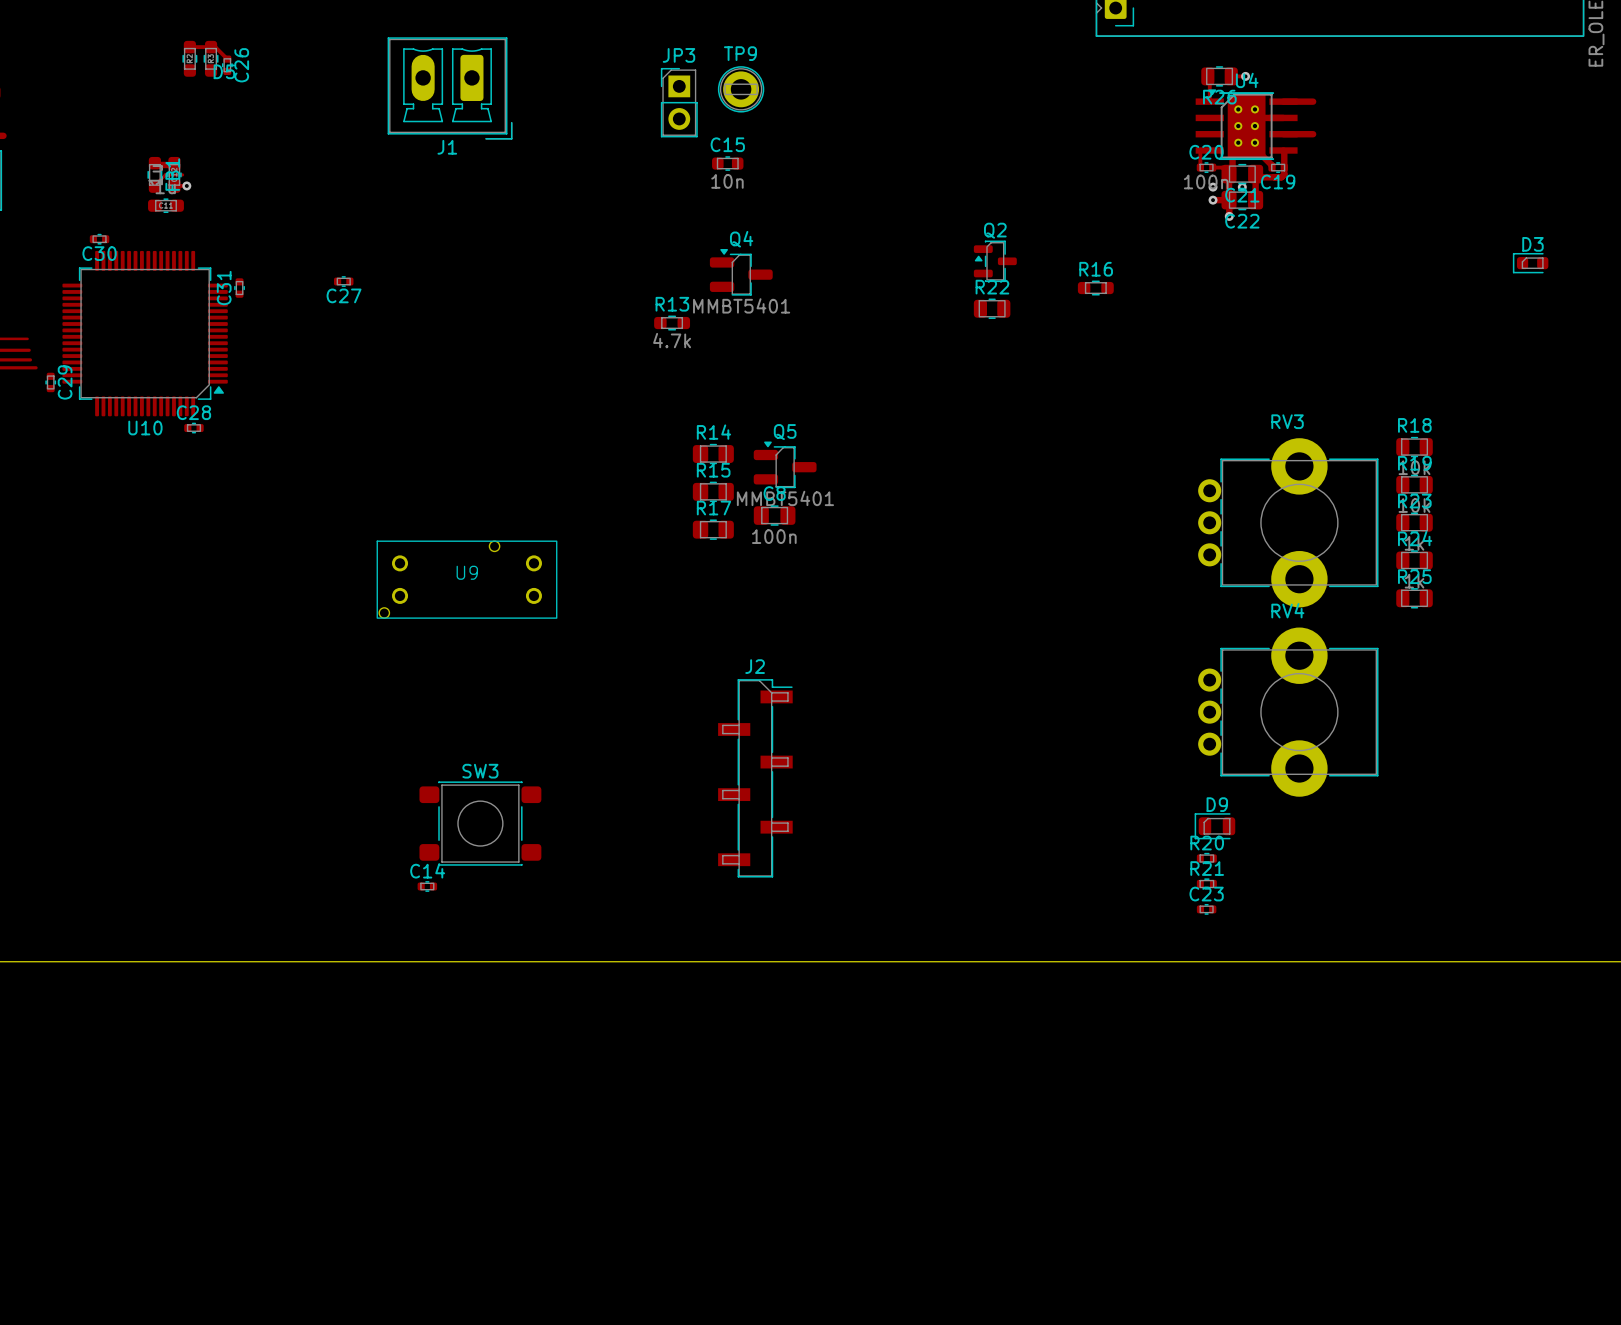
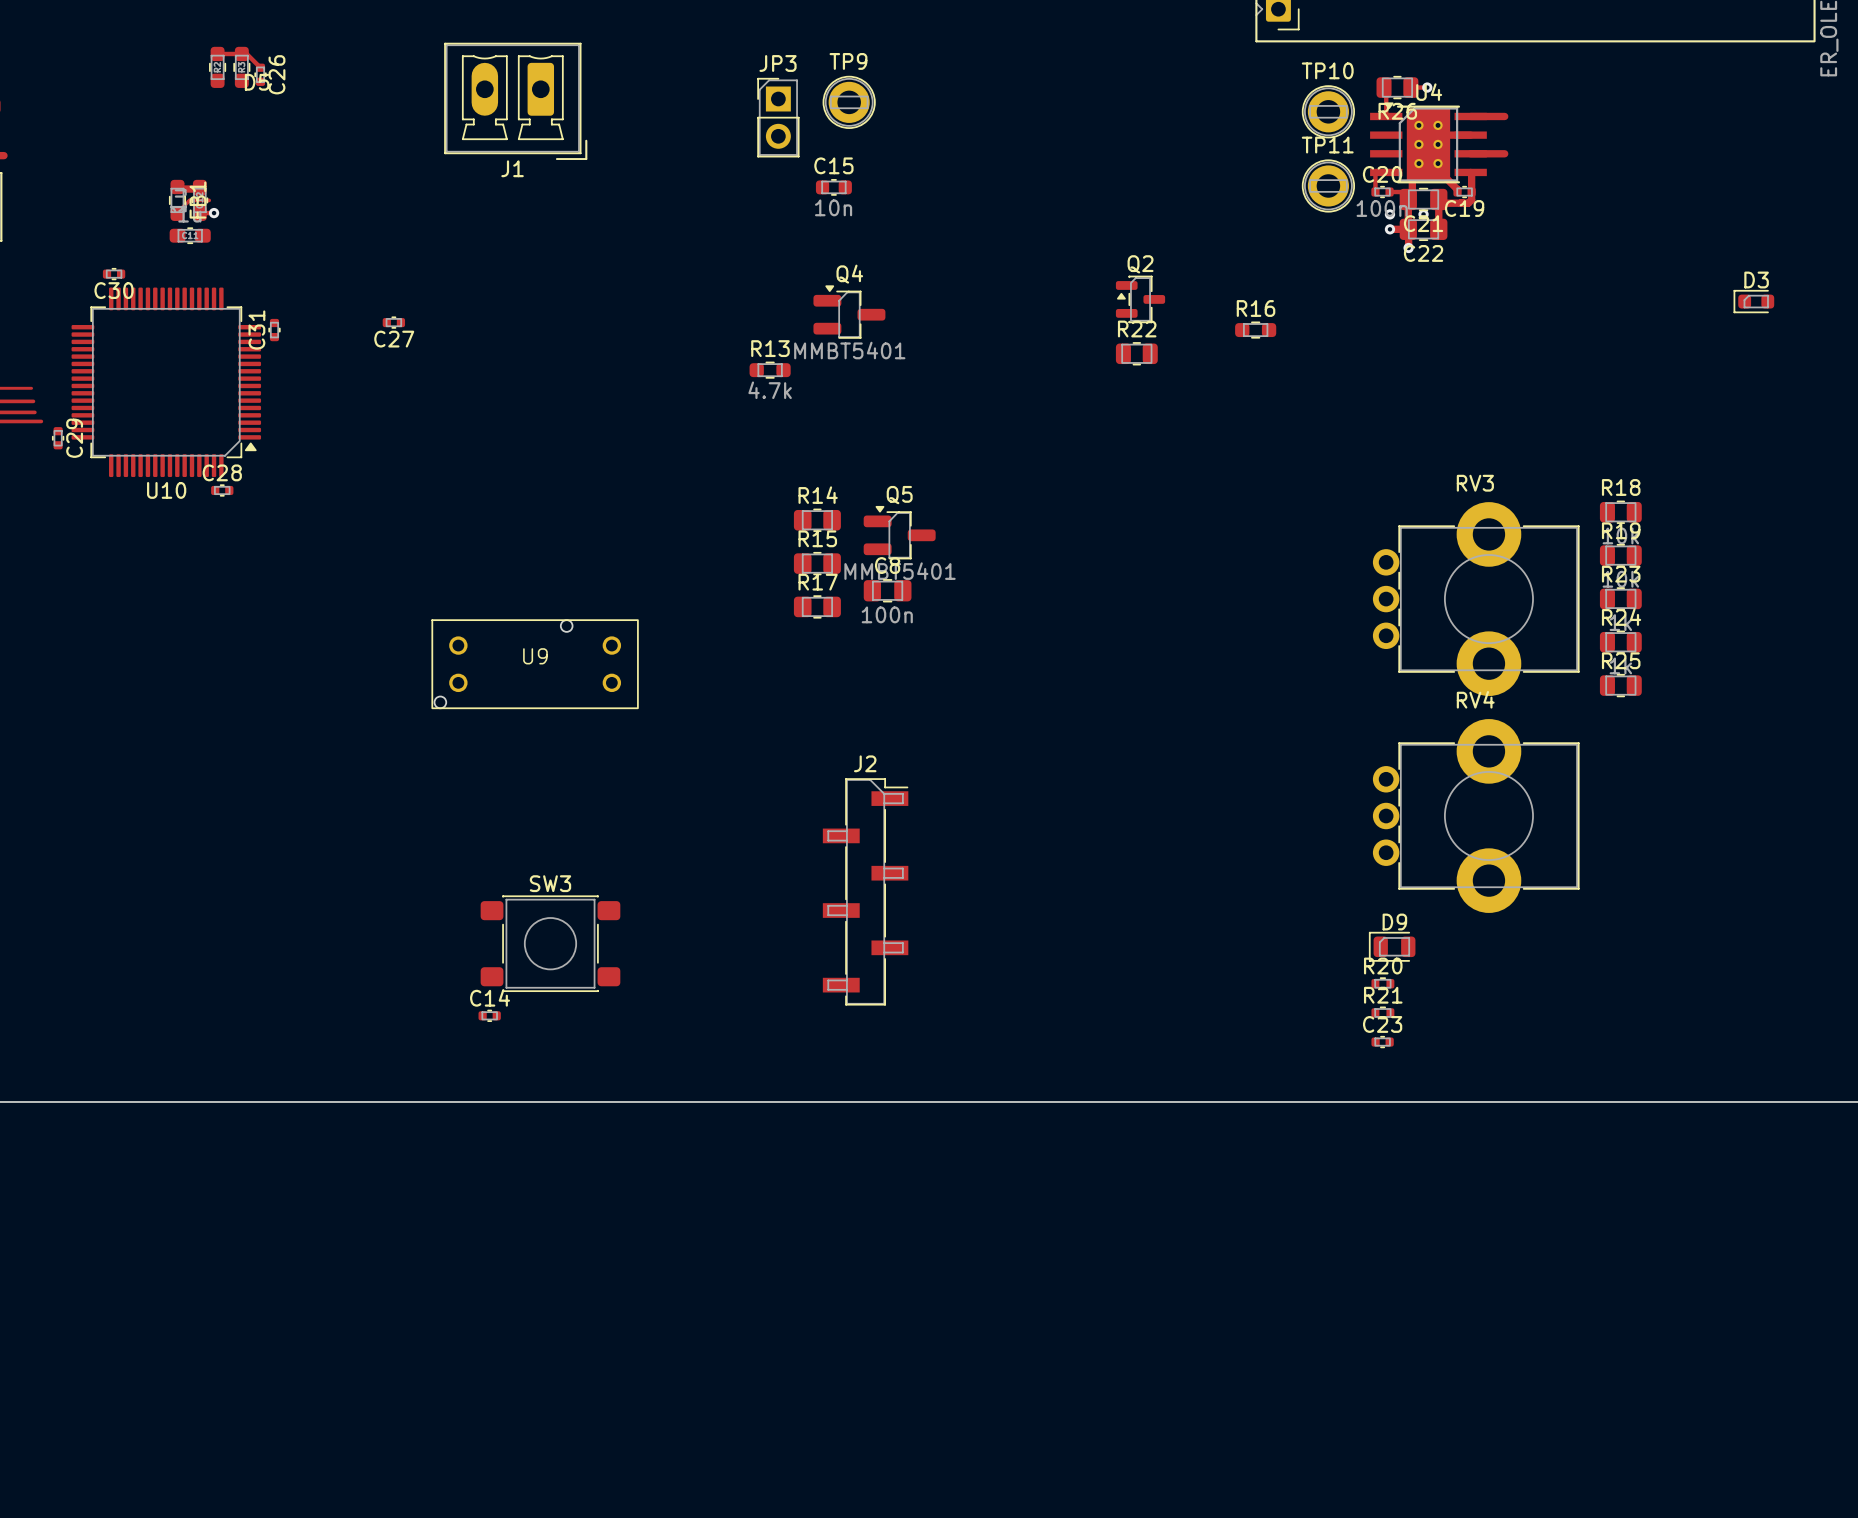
TP10: none -> (1328, 111)
TP11: none -> (1328, 185)

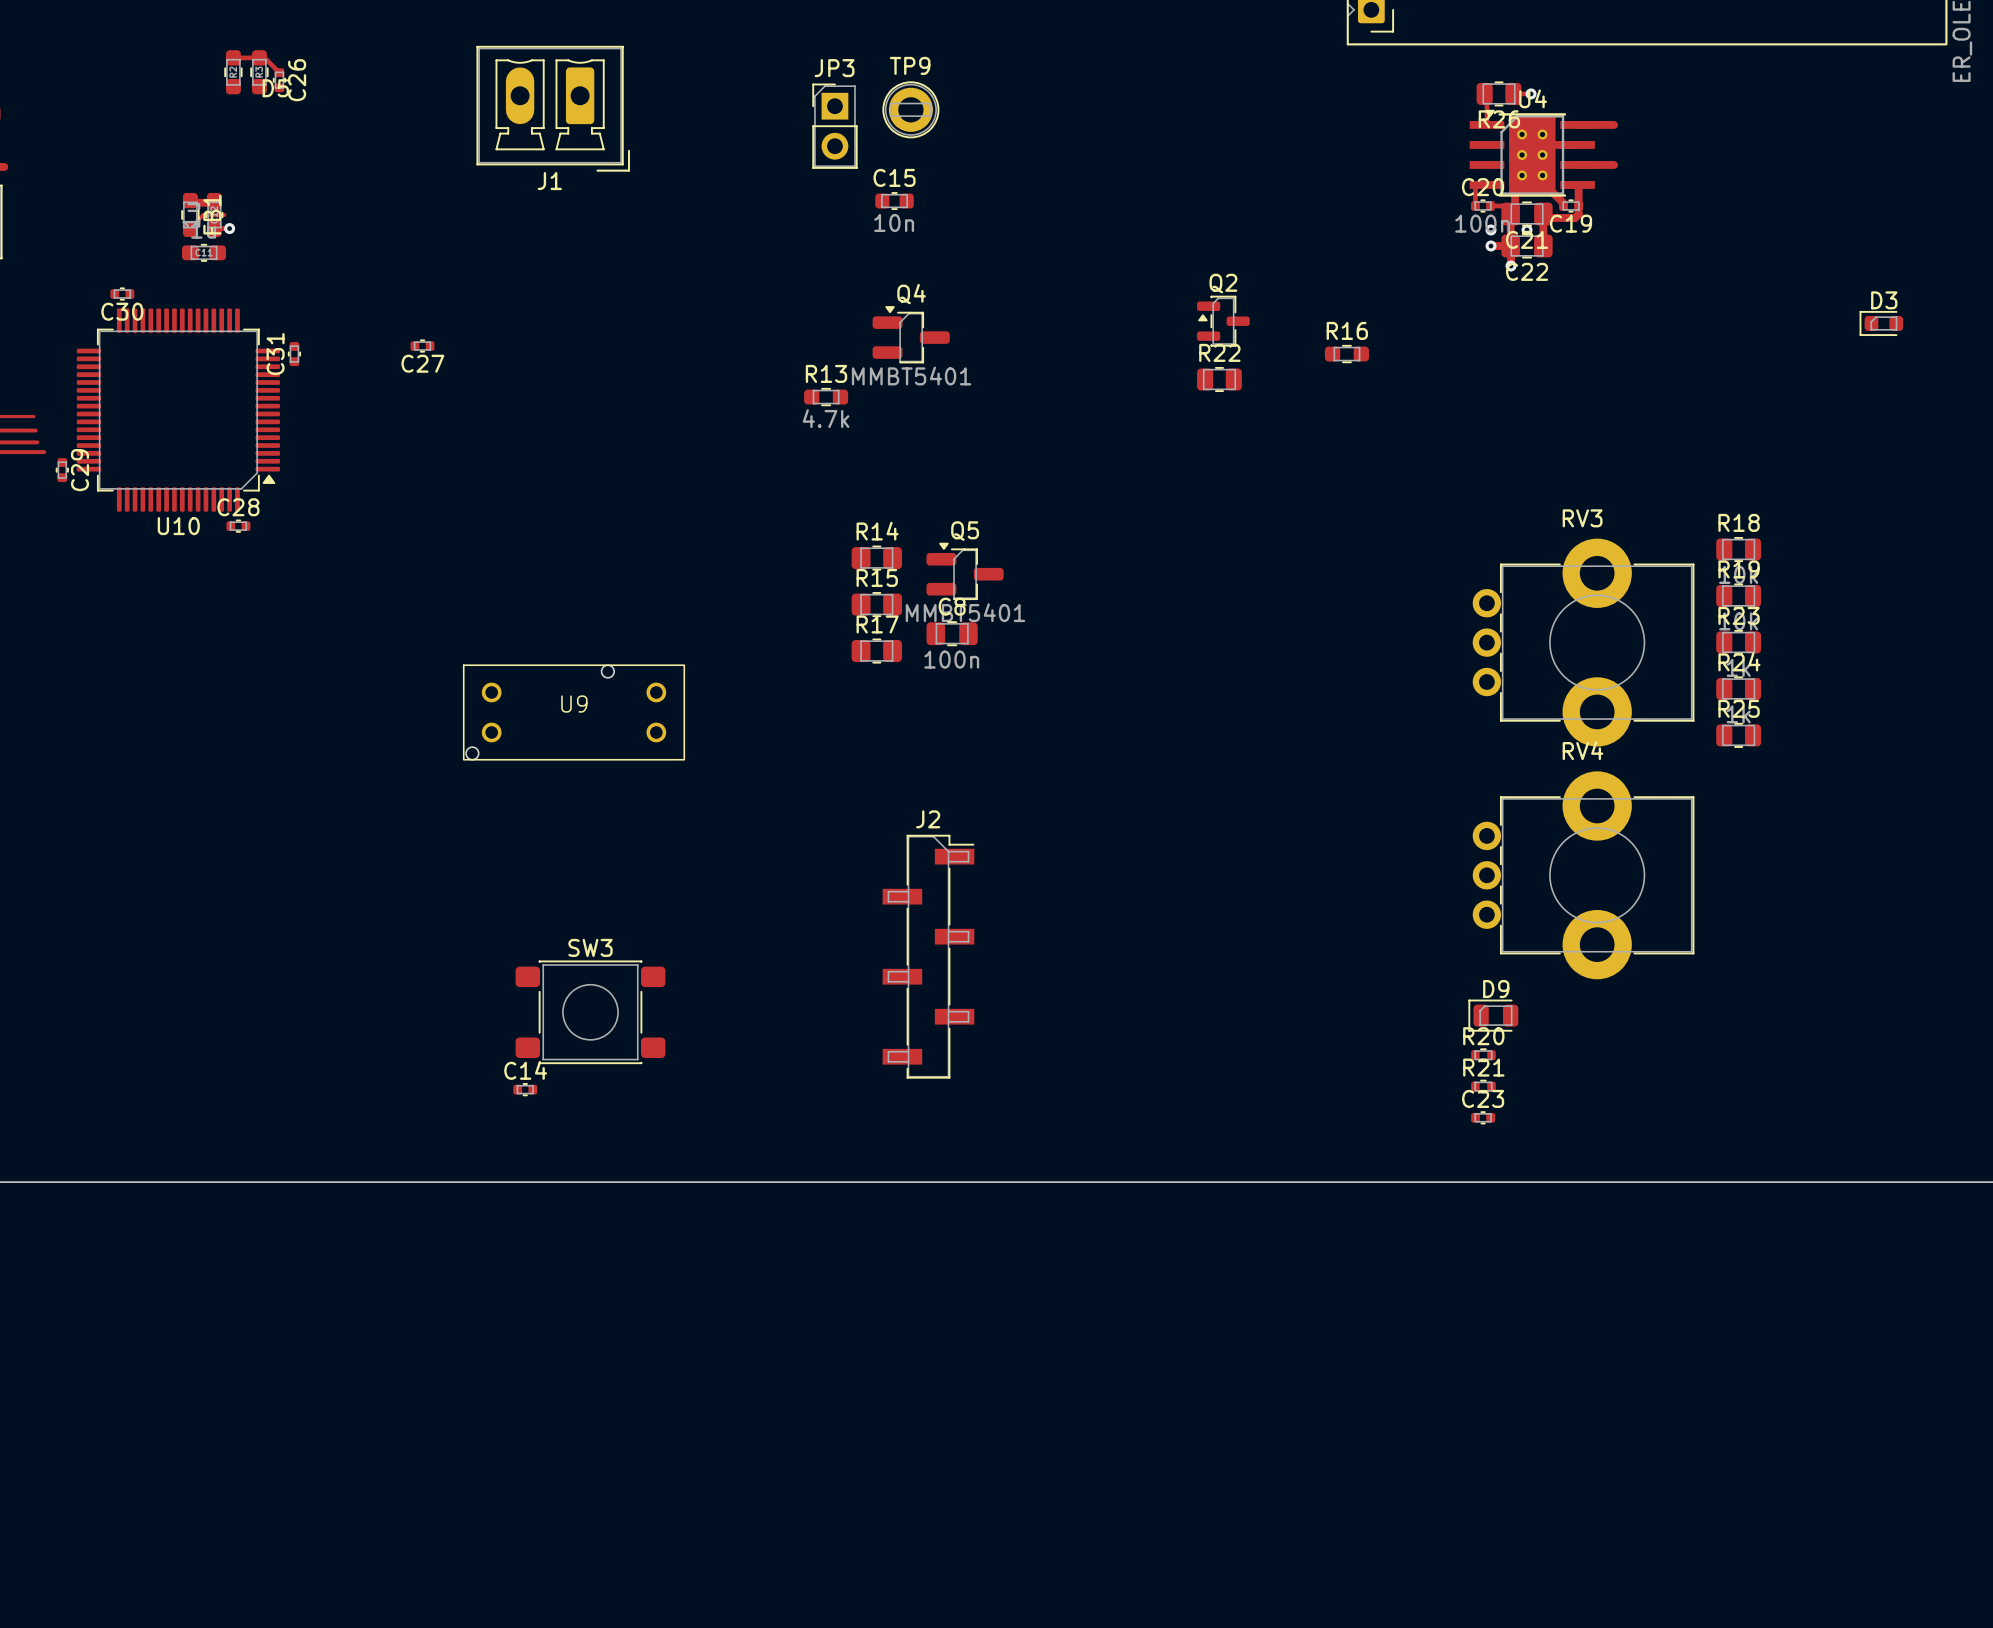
TP10: (1328, 111) -> none
TP11: (1328, 185) -> none

